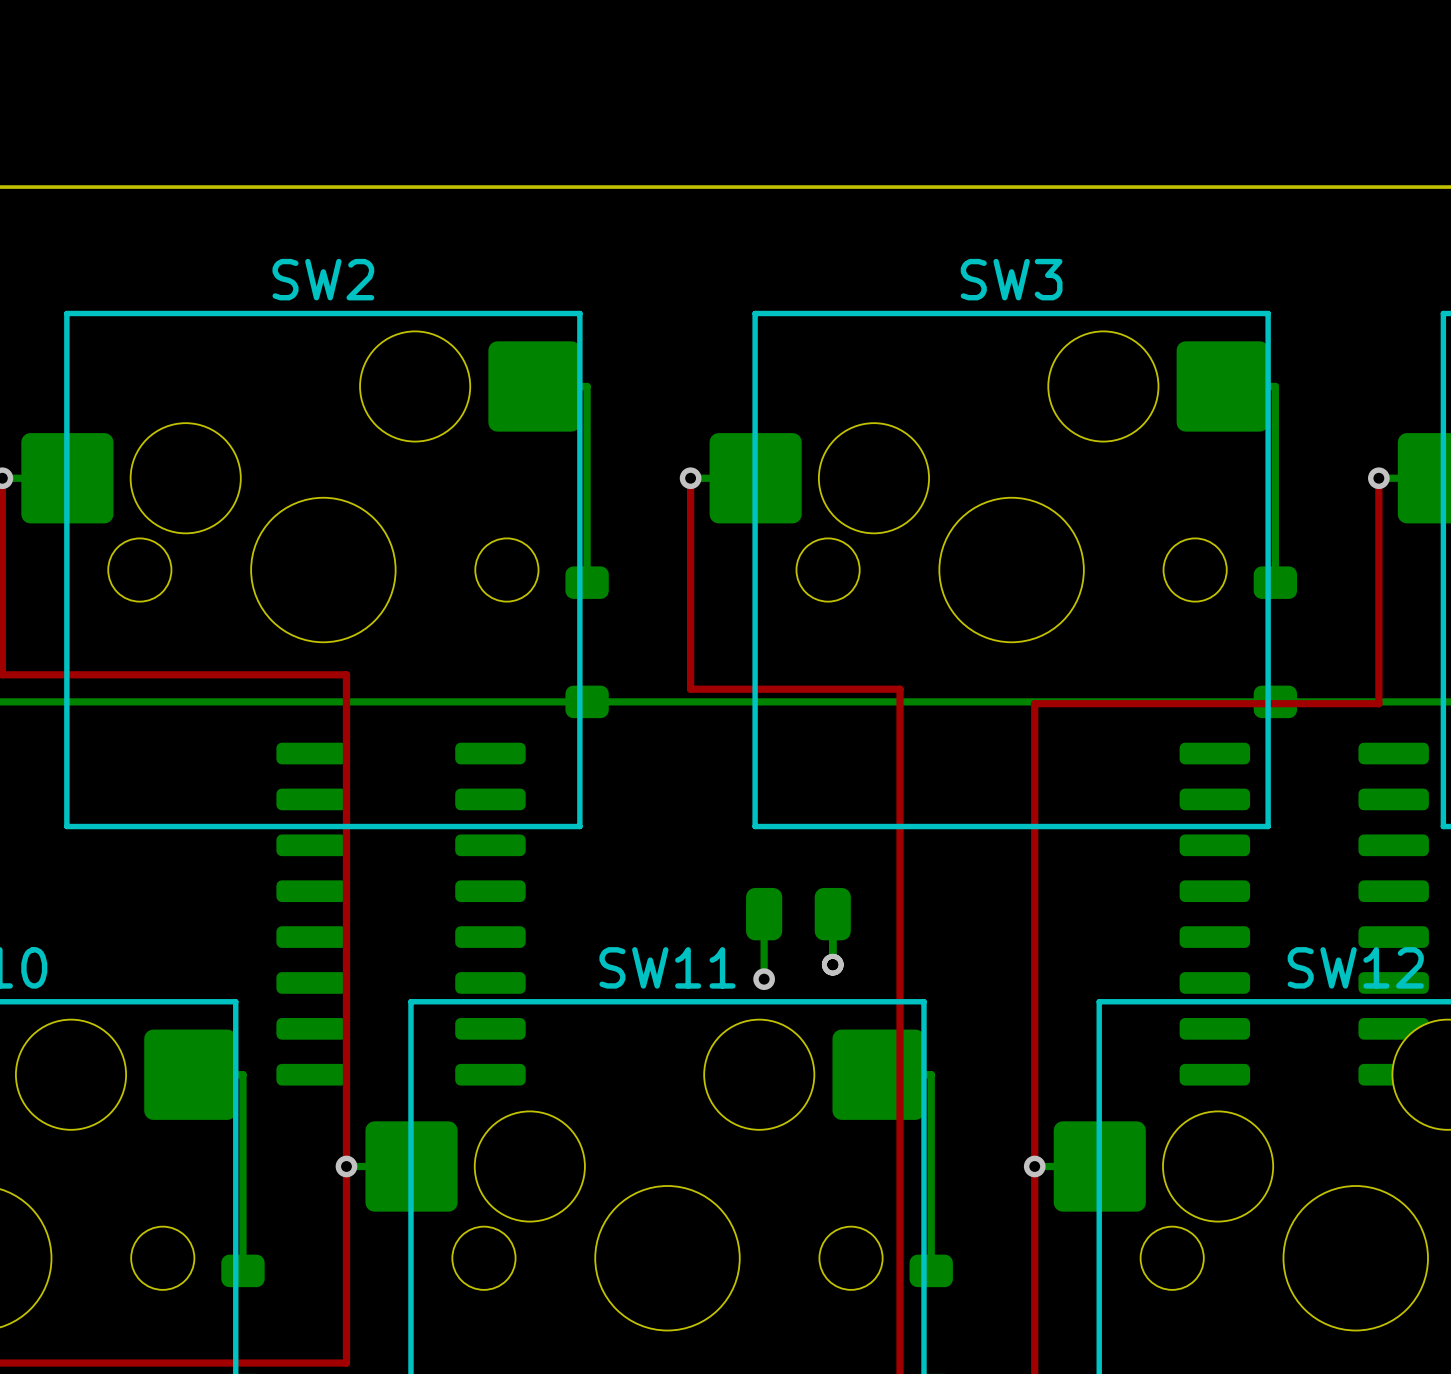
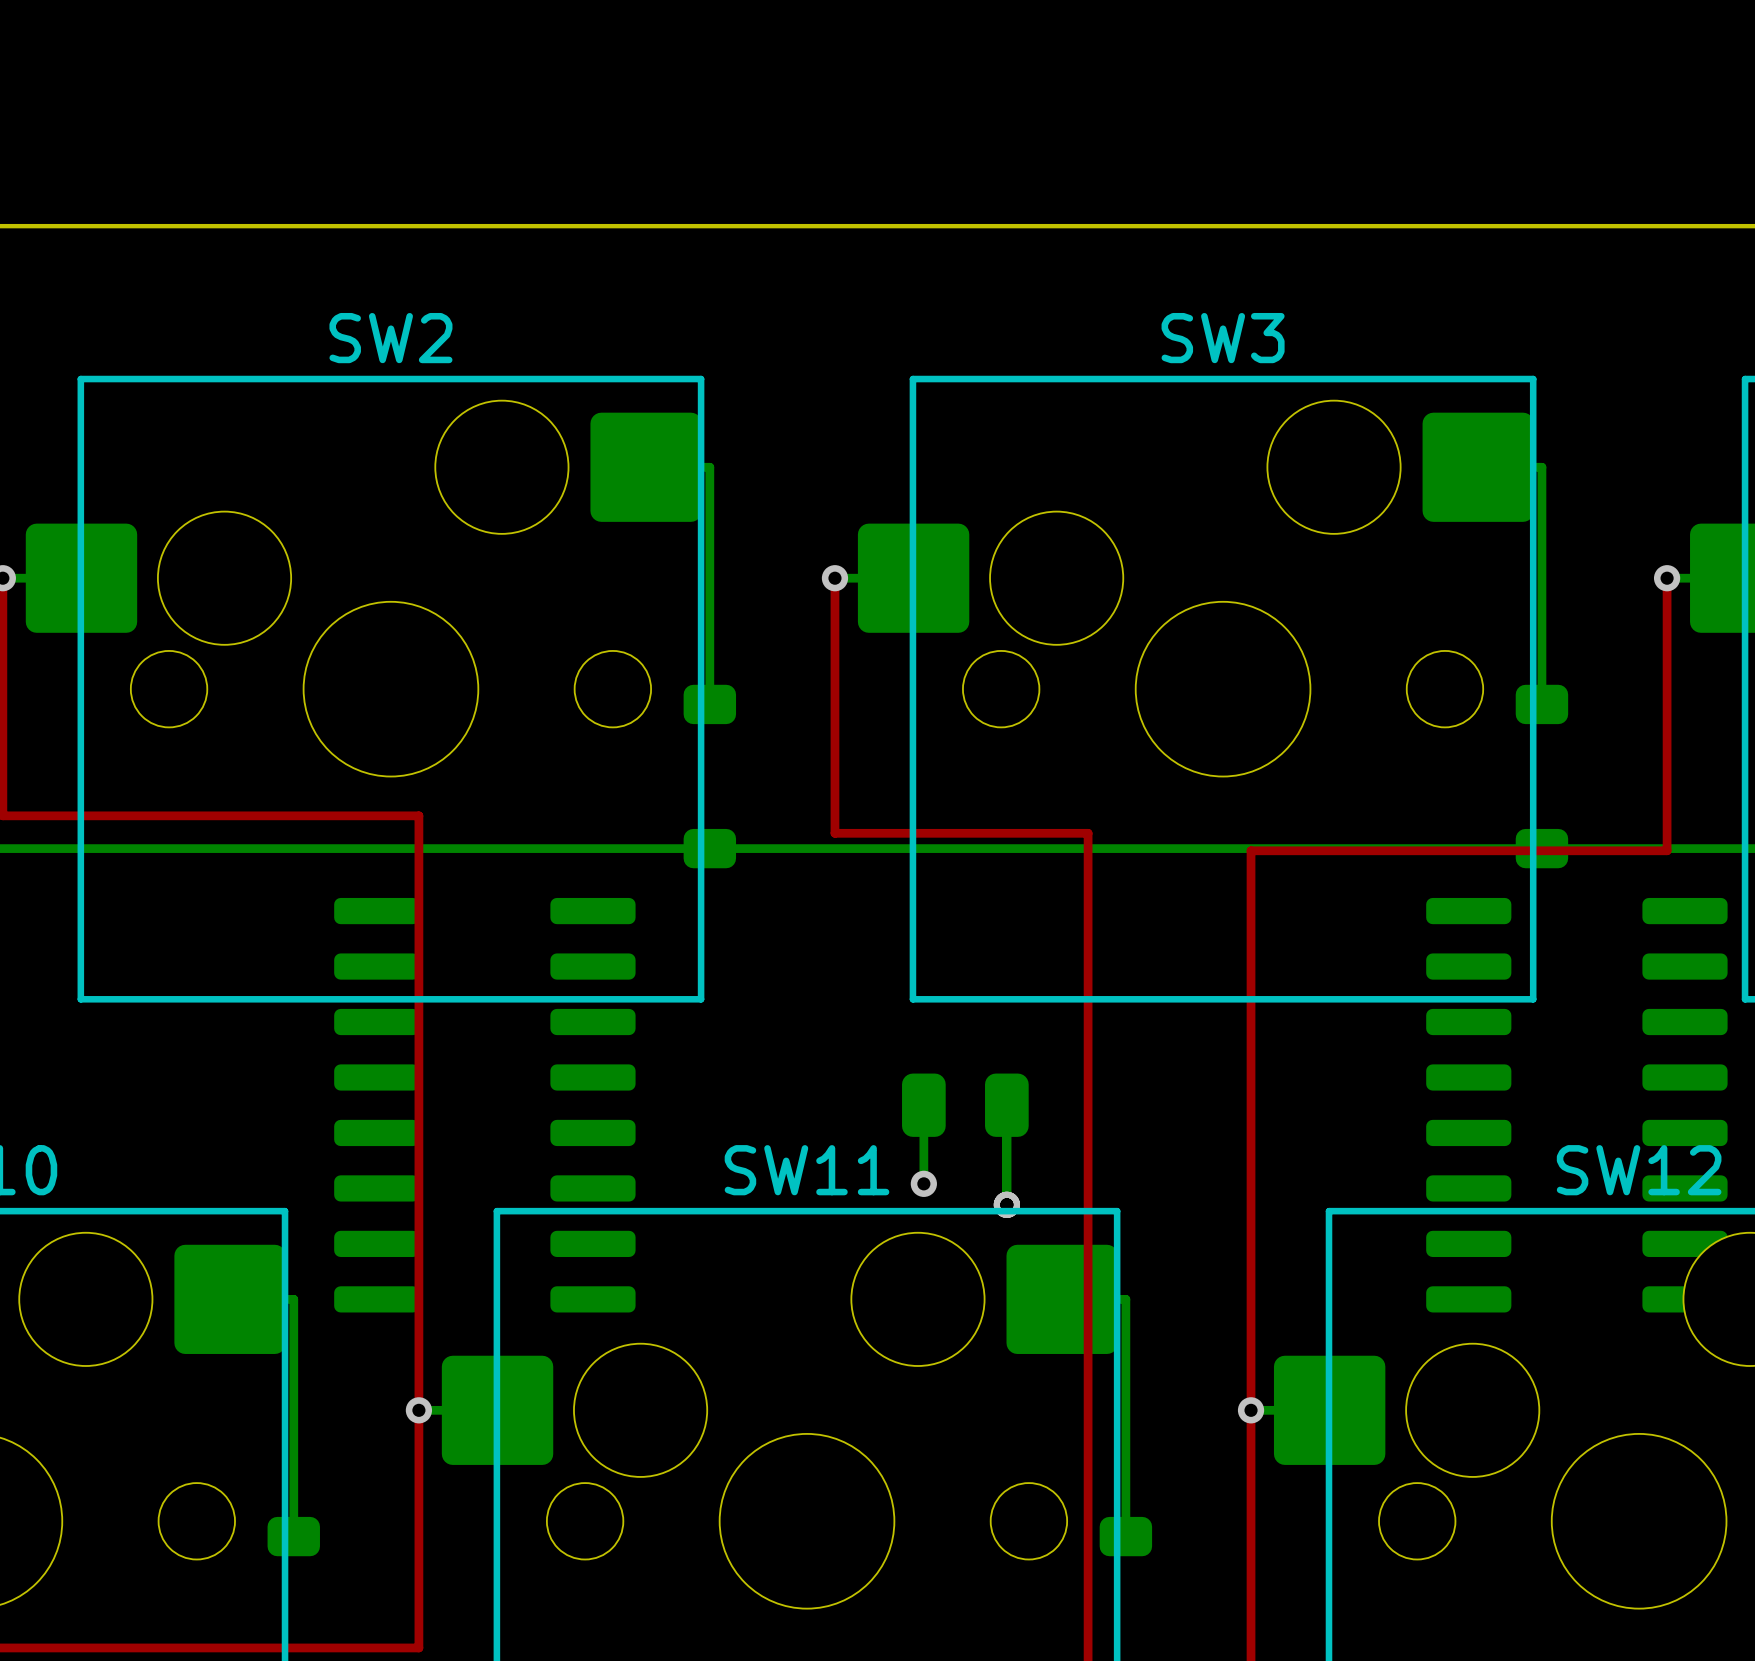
bottom track: none -> (1006, 1166) (1006, 1204)
via position: (832, 964) -> (1006, 1204)

